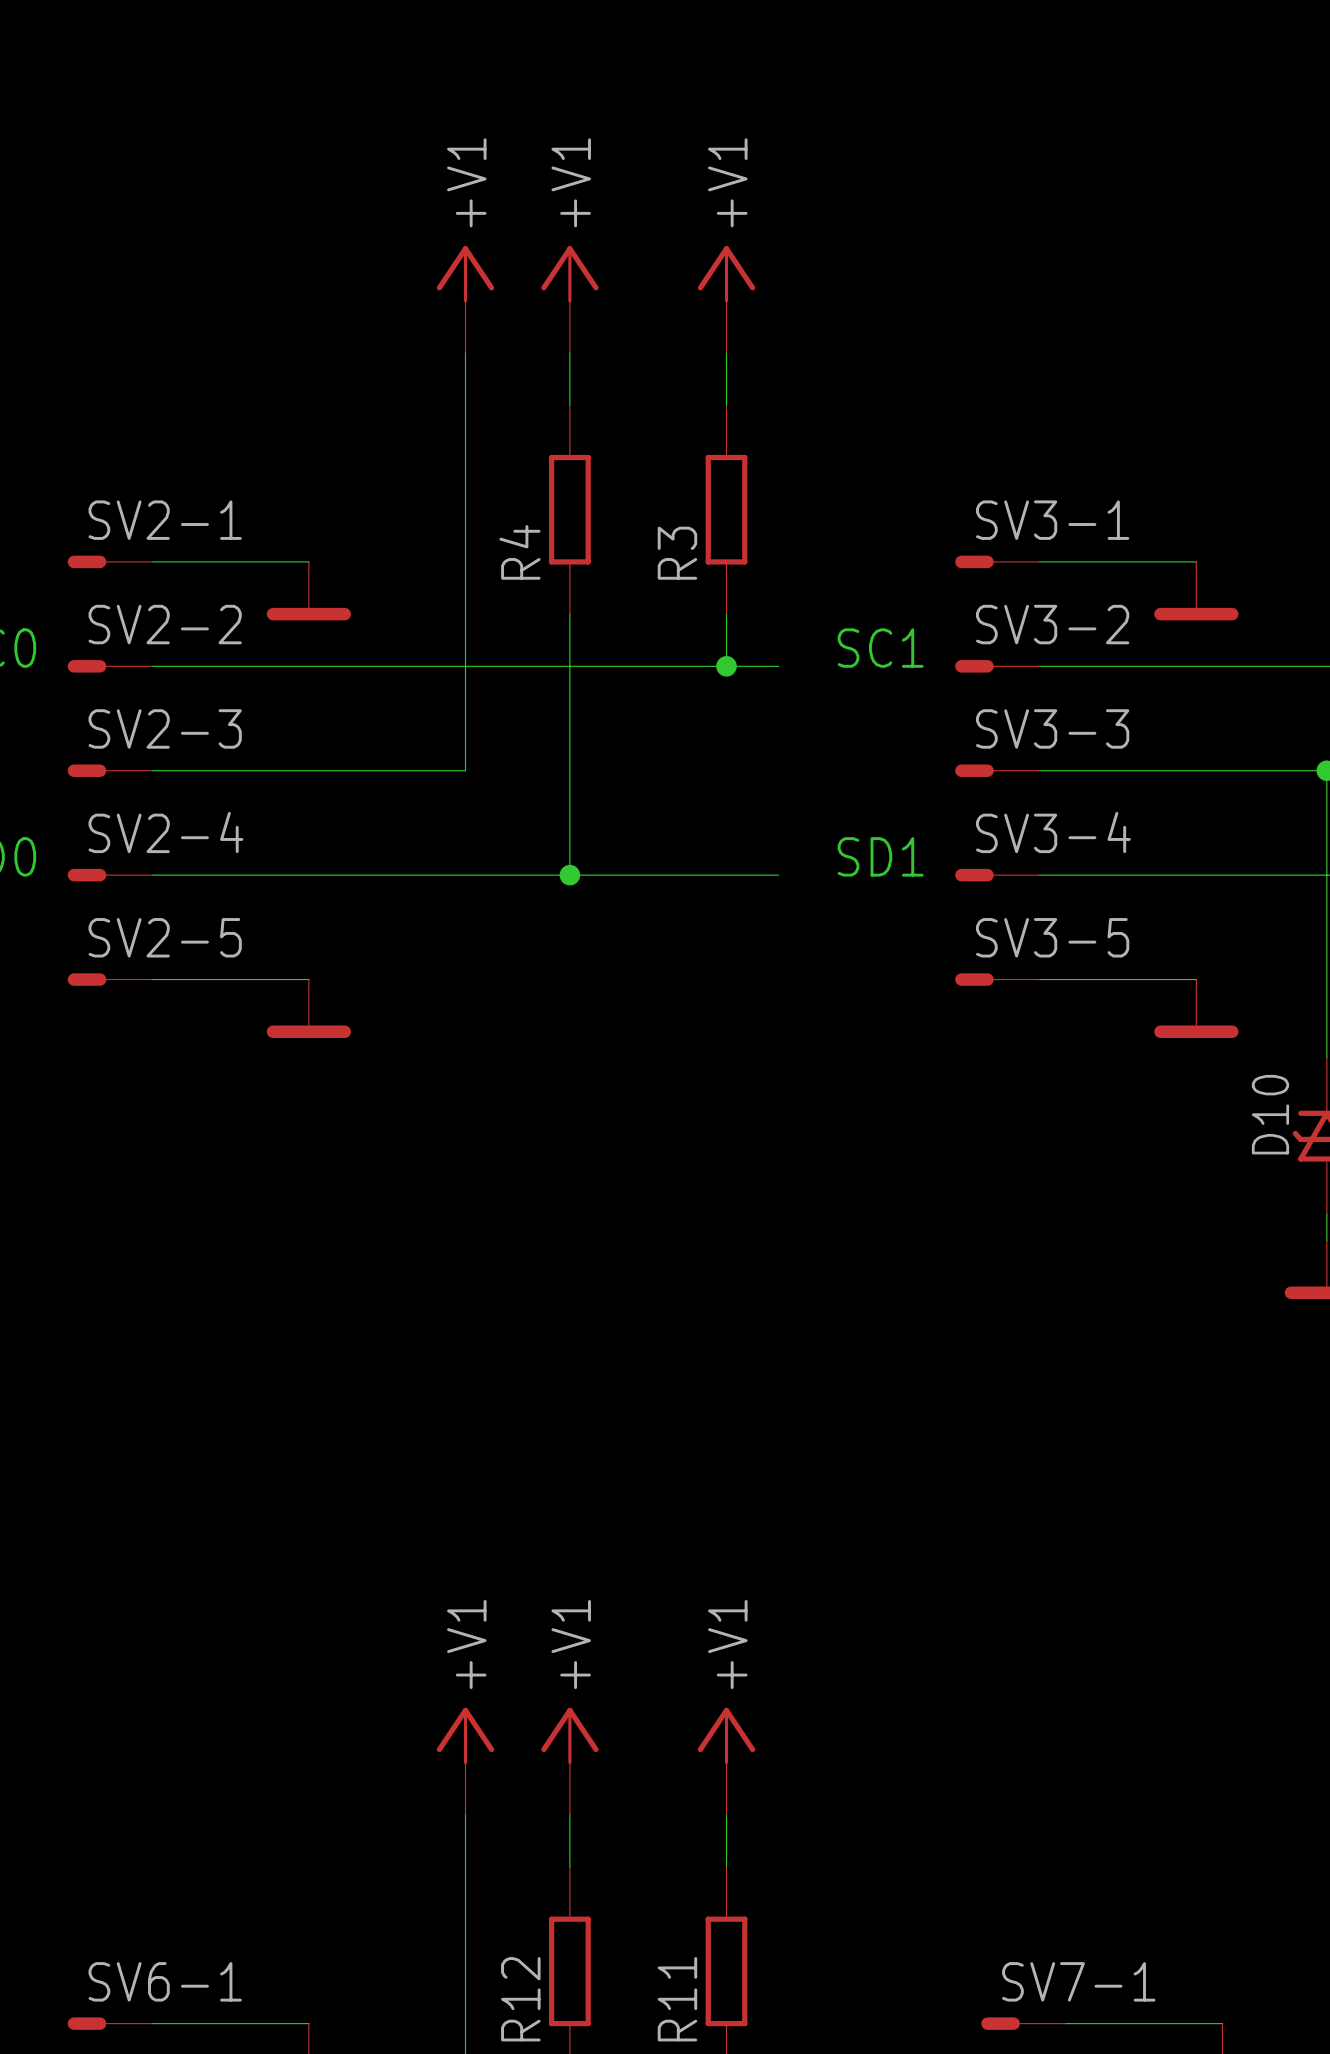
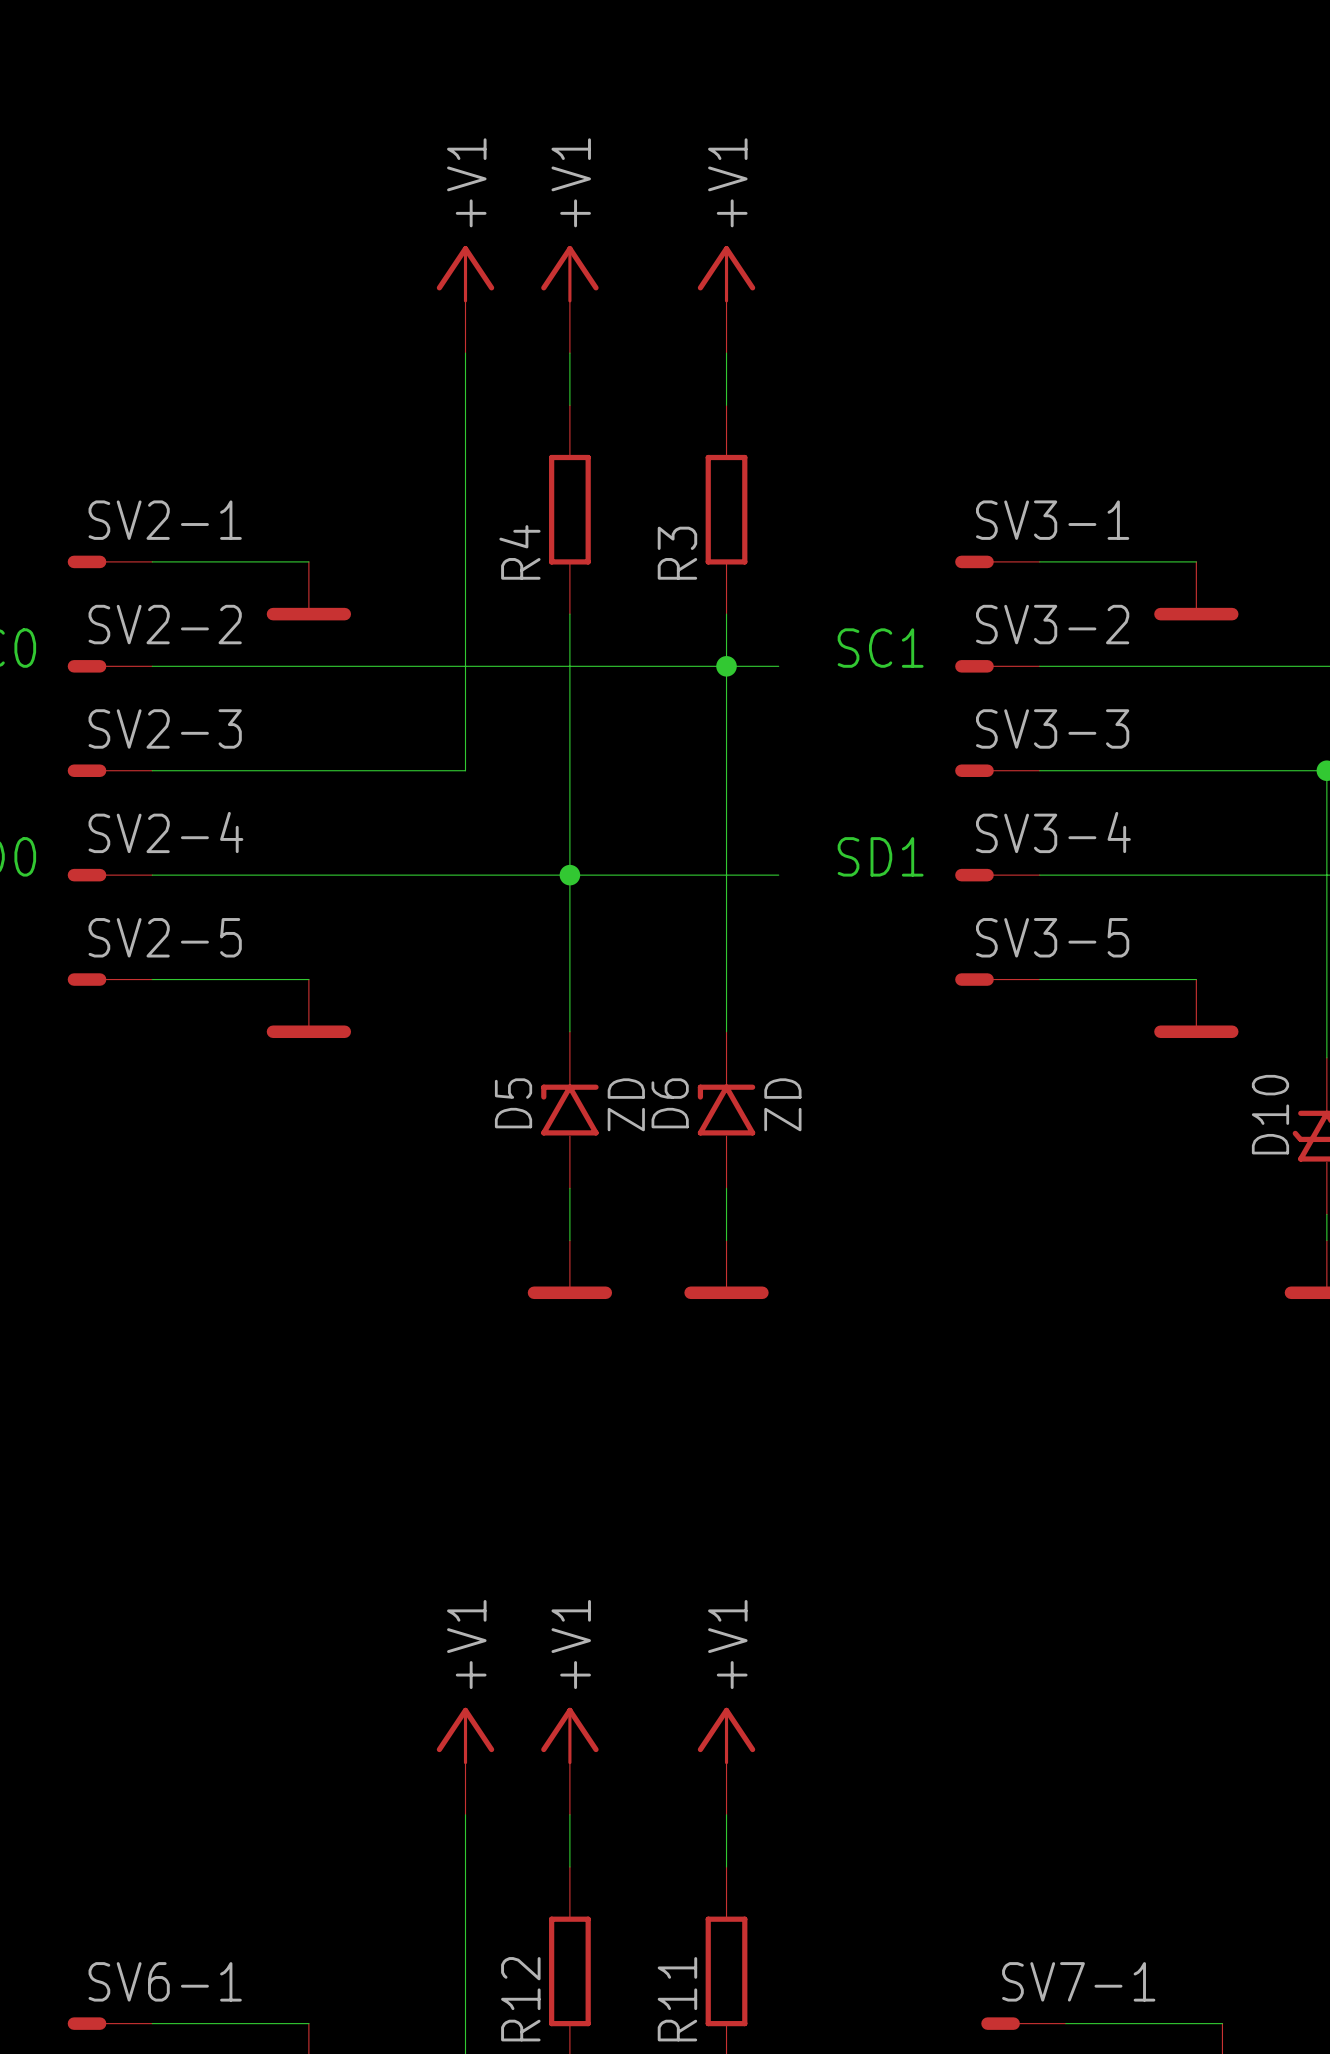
wire: none -> (726, 666) (726, 1031)
wire: none -> (569, 875) (569, 1031)
D5: none -> ZD (569, 1110)
D6: none -> ZD (726, 1110)
wire: none -> (569, 1188) (569, 1240)
wire: none -> (726, 1188) (726, 1240)
power symbol: none -> (569, 1269)
power symbol: none -> (726, 1269)

